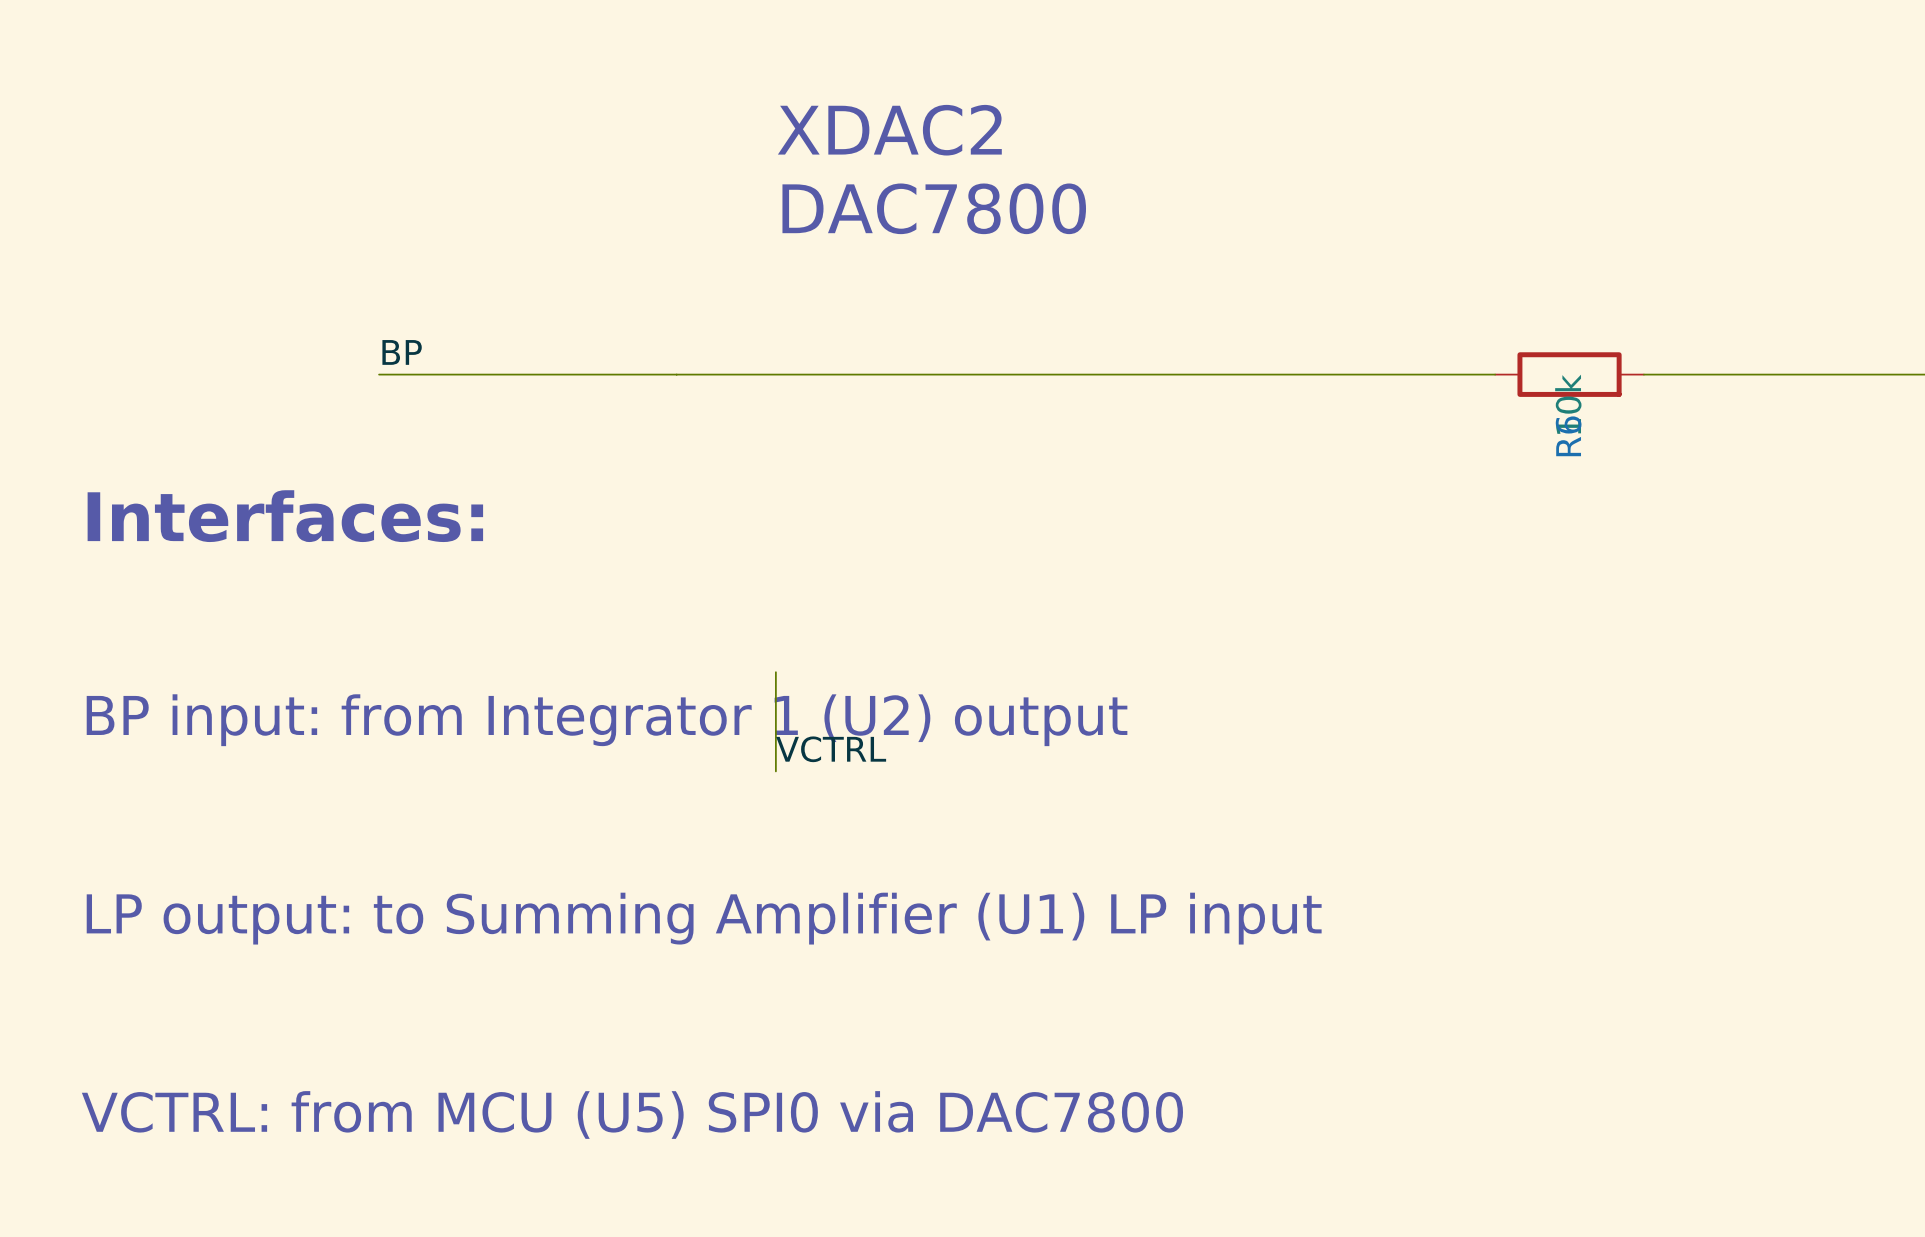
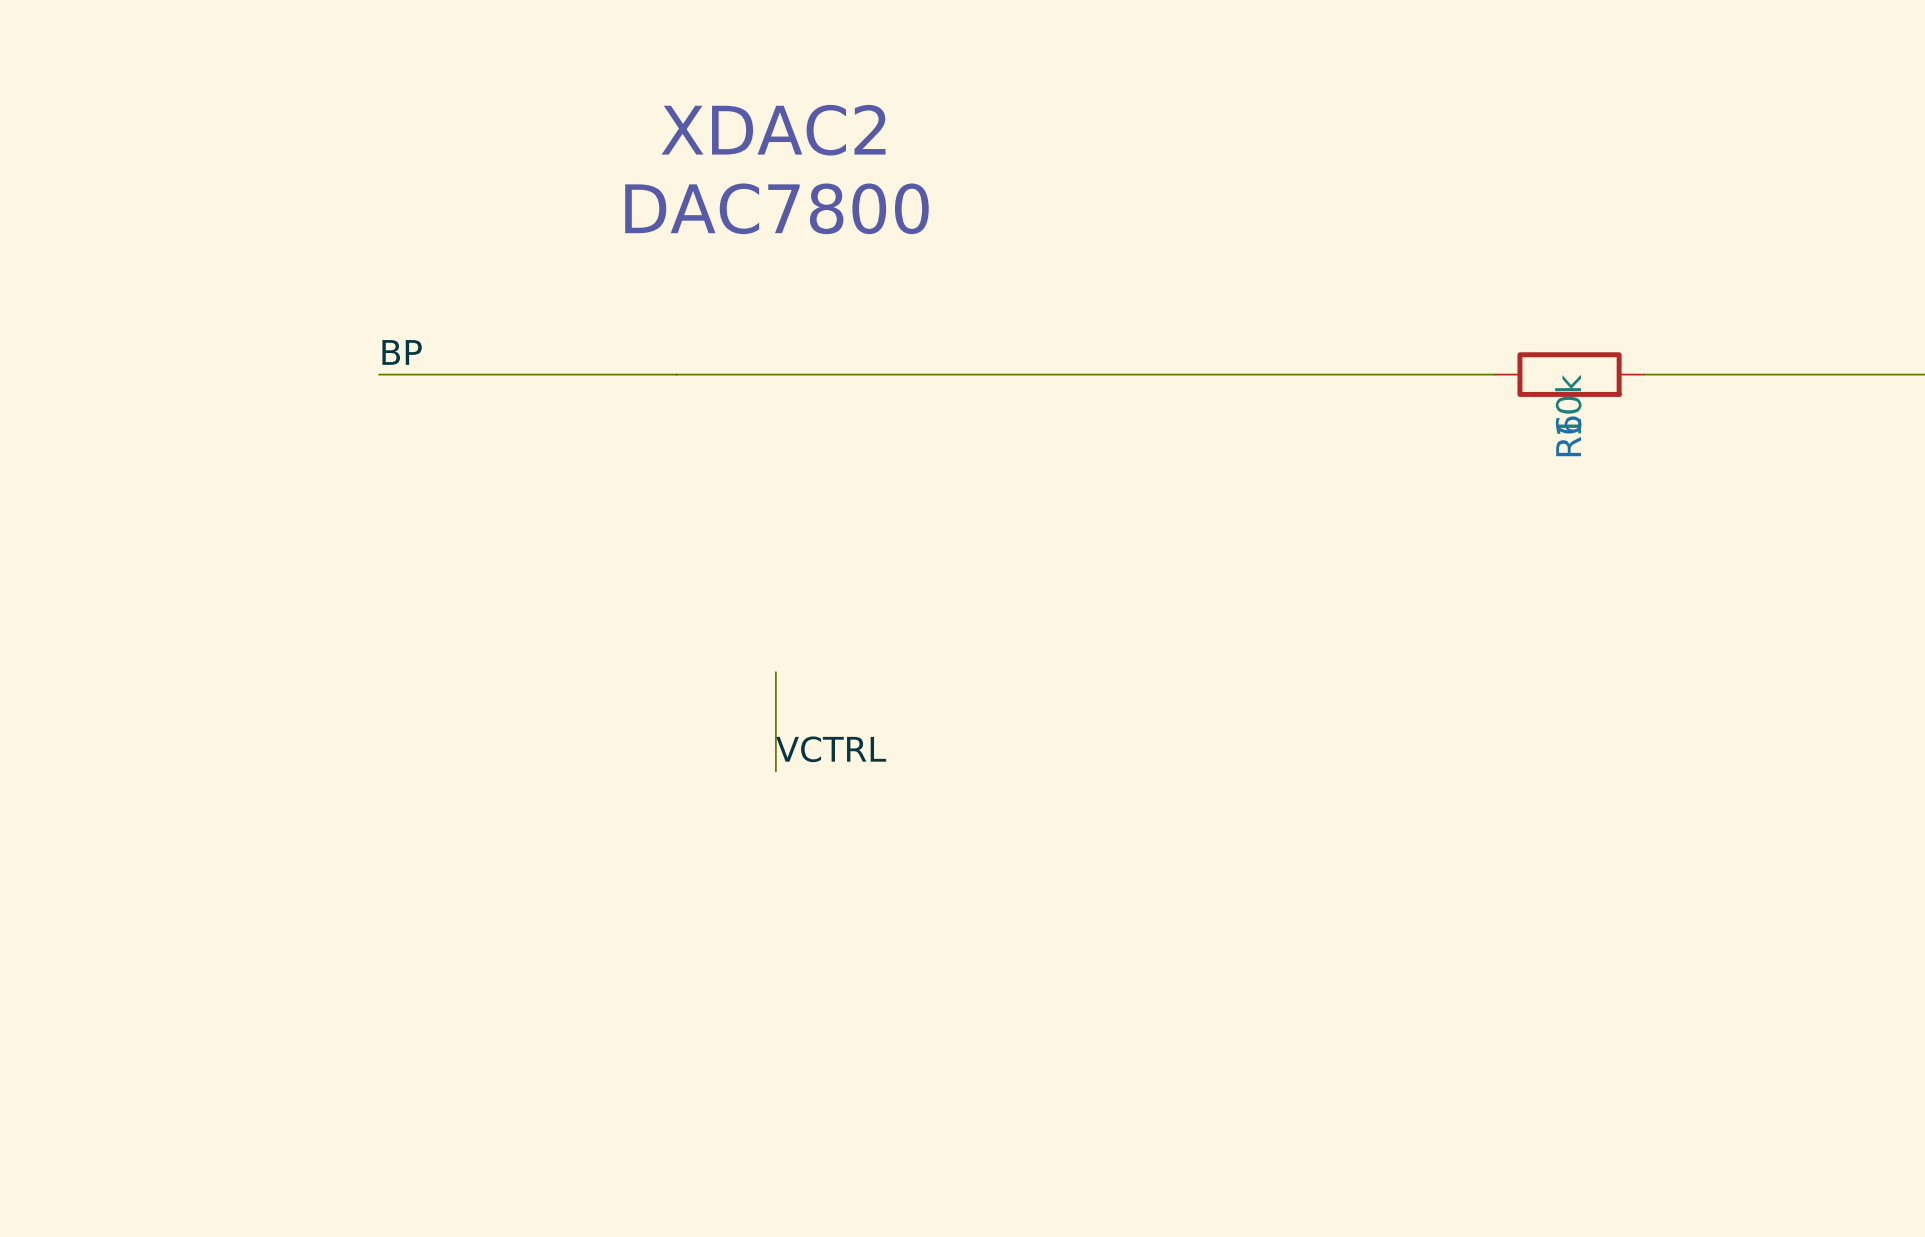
text position: XDAC2 (889, 130) -> XDAC2 (773, 130)
text position: DAC7800 (934, 208) -> DAC7800 (776, 208)
text: Interfaces: (285, 516) -> none
text: BP input: from Integrator 1 (U2) output (607, 720) -> none
text: LP output: to Summing Amplifier (U1) LP input (704, 918) -> none
text: VCTRL: from MCU (U5) SPI0 via DAC7800 (632, 1114) -> none

